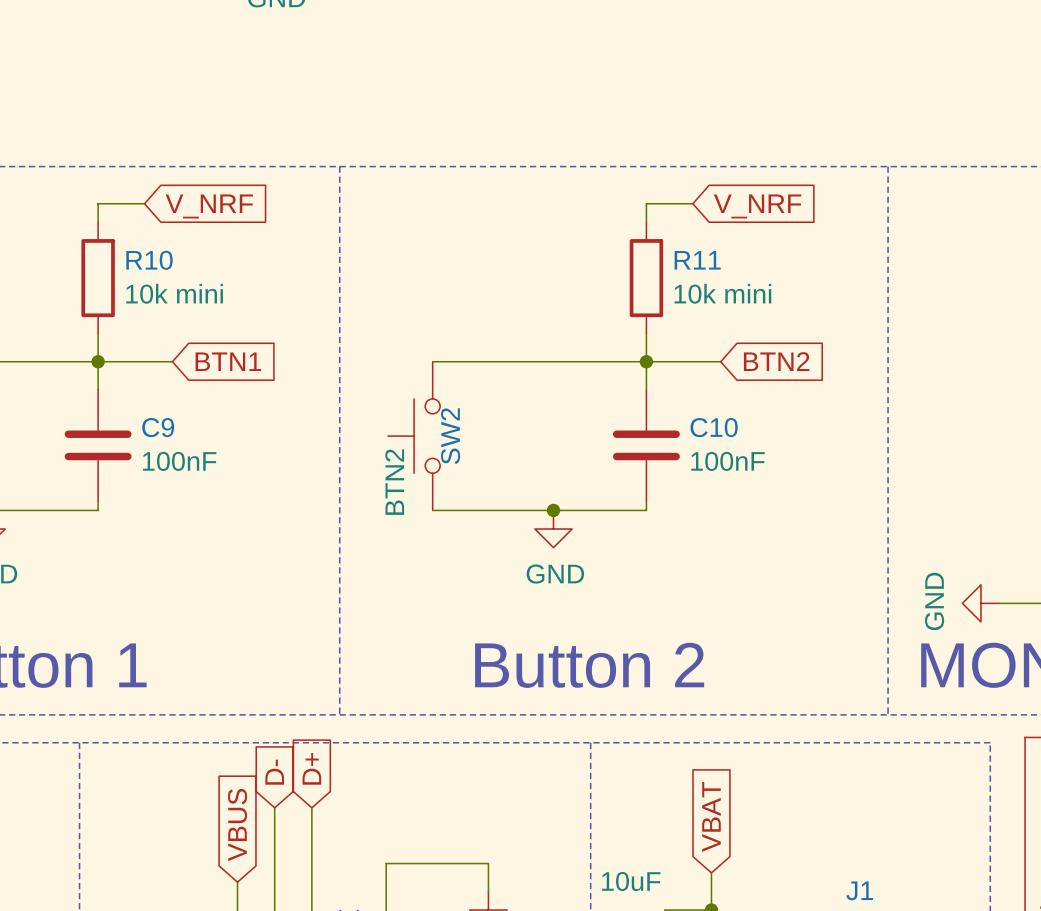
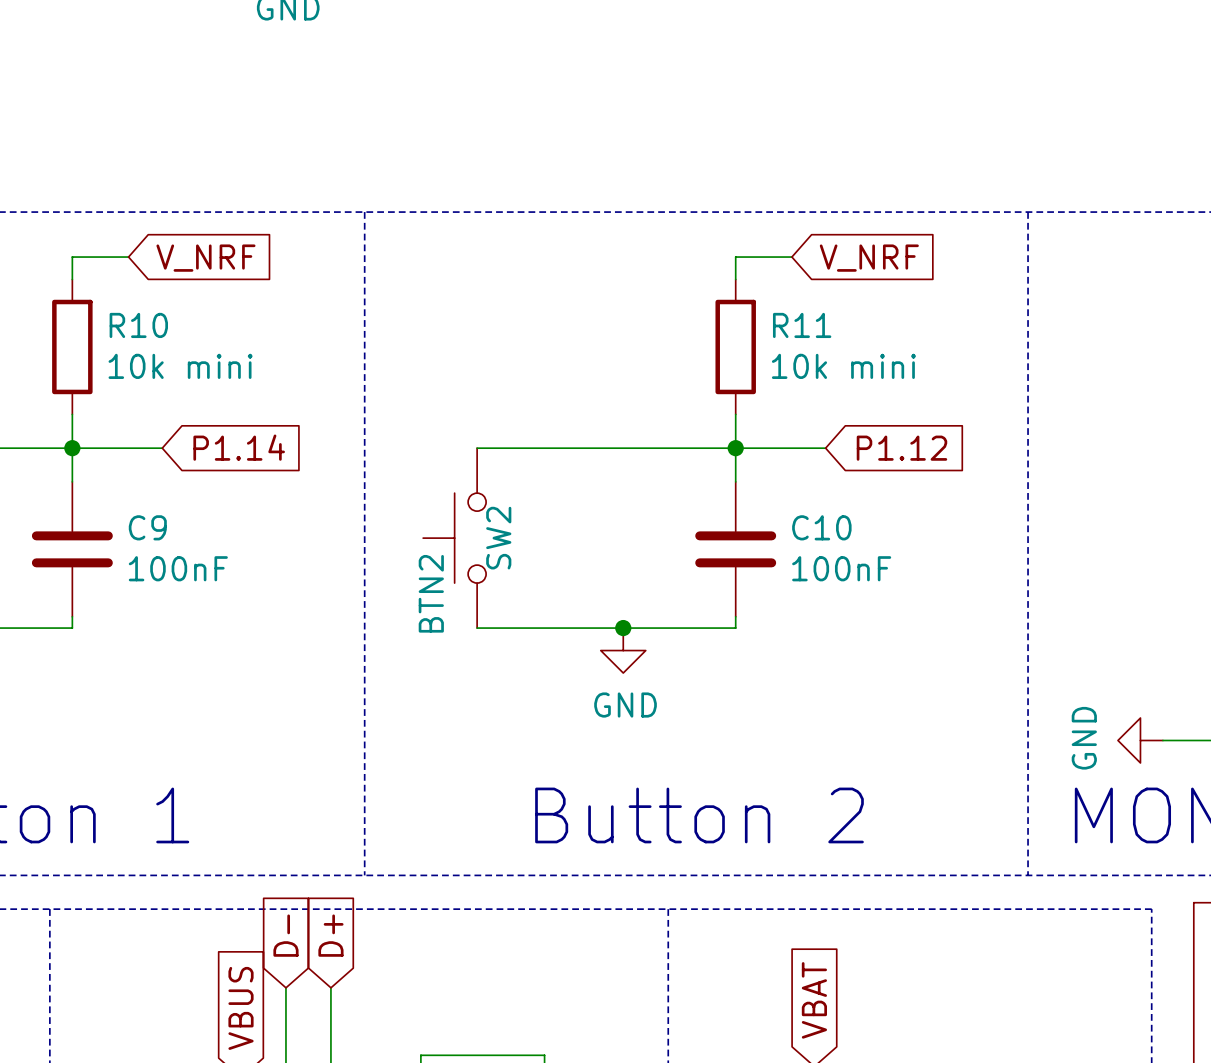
global label: BTN1 (228, 361) -> P1.14 (239, 447)
global label: BTN2 (776, 361) -> P1.12 (901, 448)

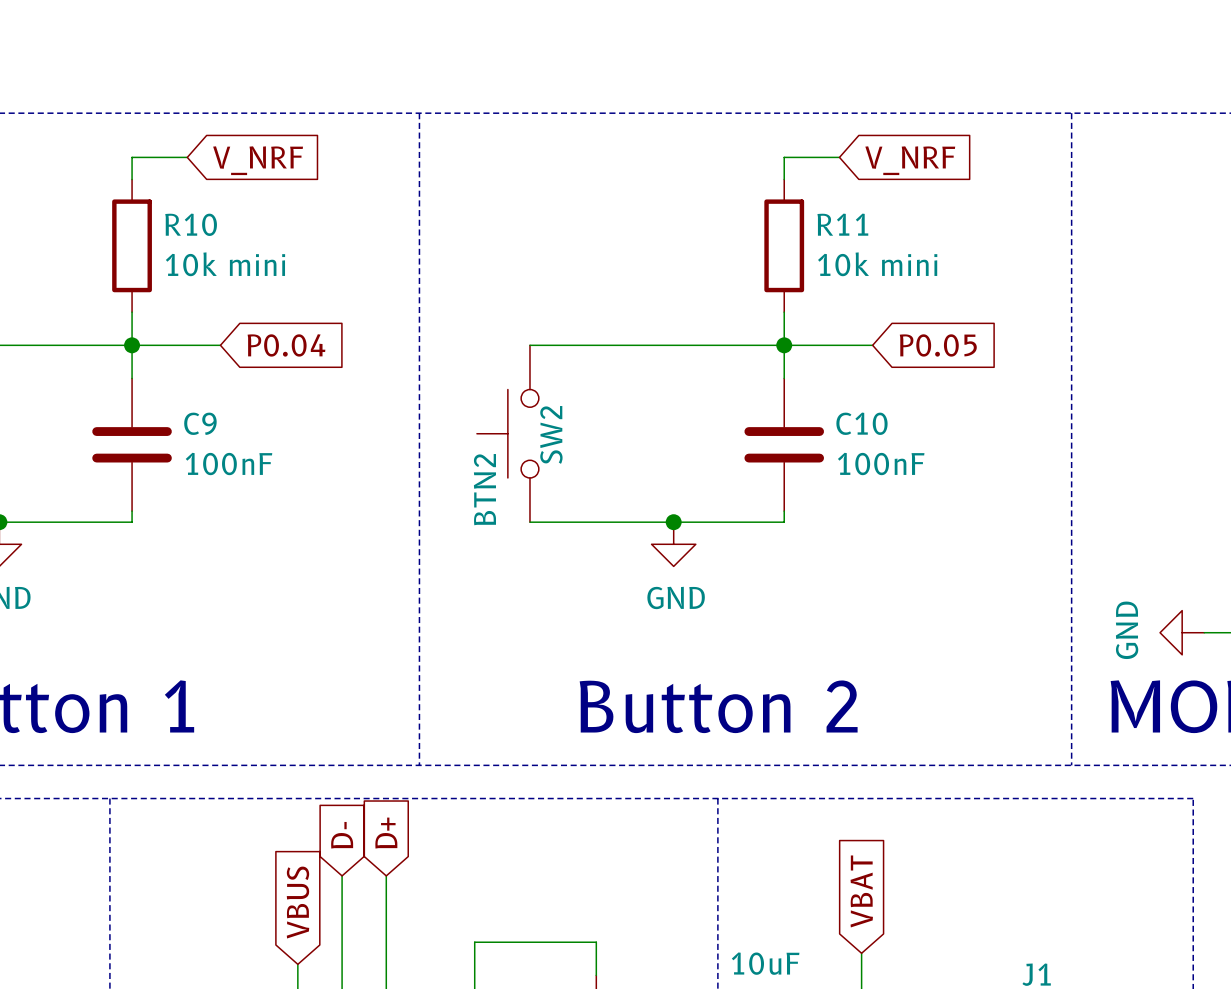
global label: P1.14 (239, 447) -> P0.04 (286, 345)
global label: P1.12 (901, 448) -> P0.05 (938, 345)

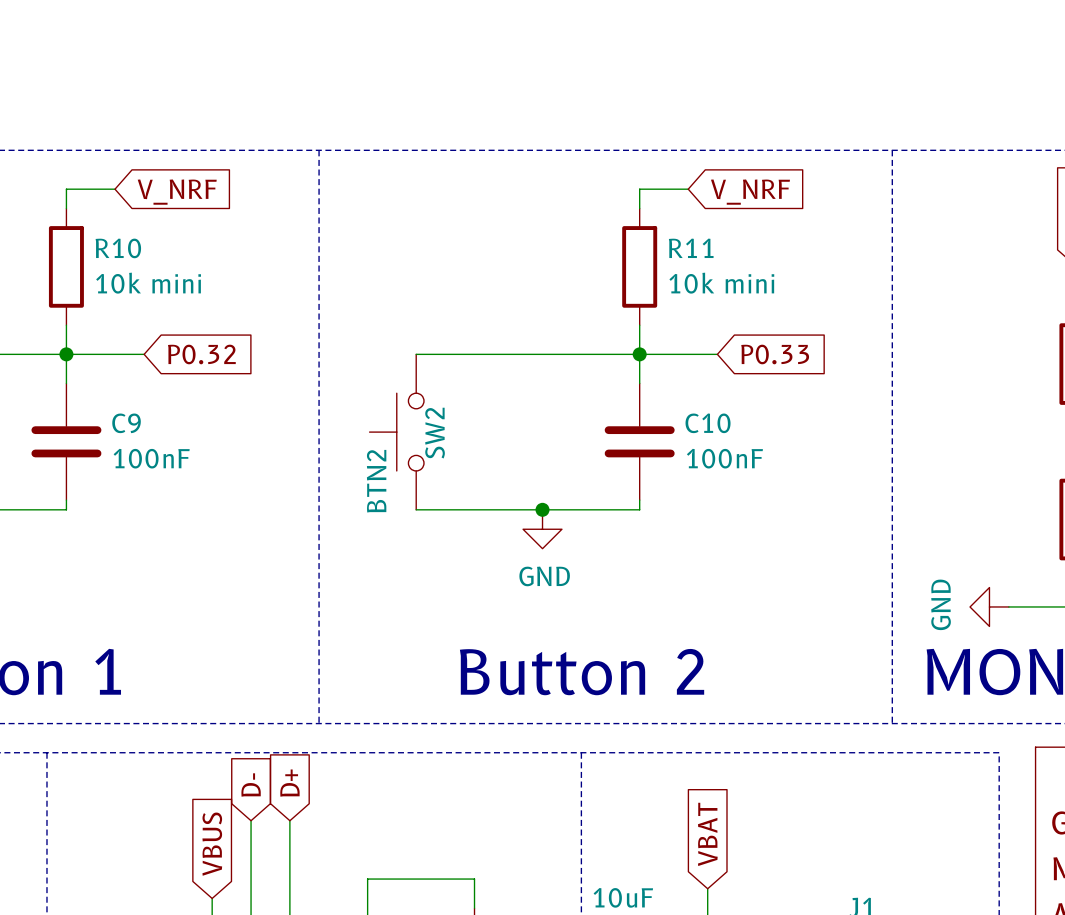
global label: P0.04 (286, 345) -> P0.32 (201, 354)
global label: P0.05 (938, 345) -> P0.33 (775, 354)

